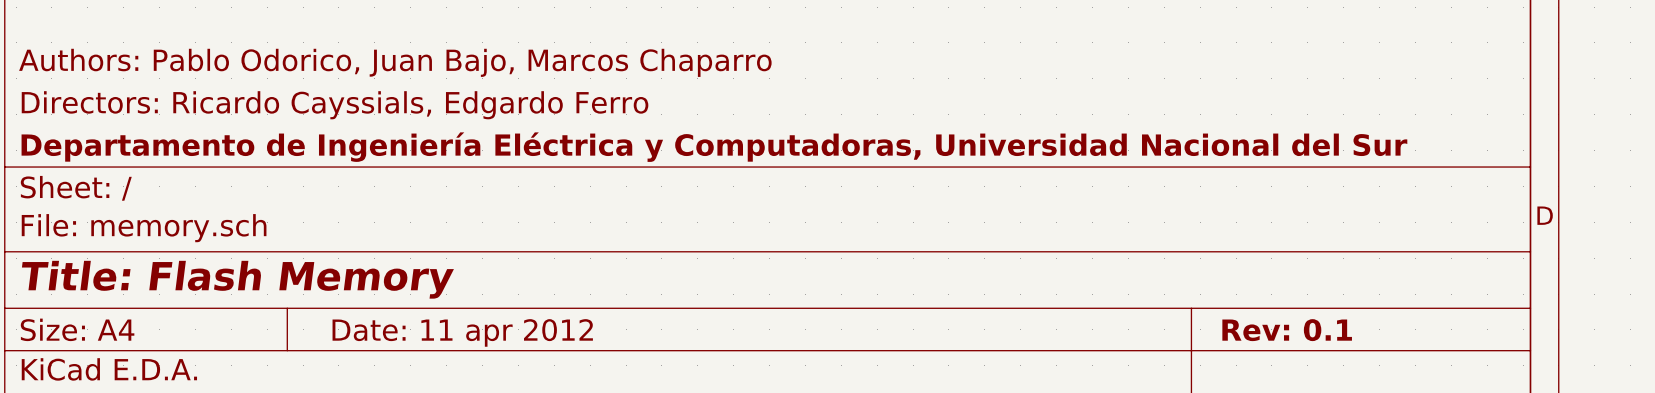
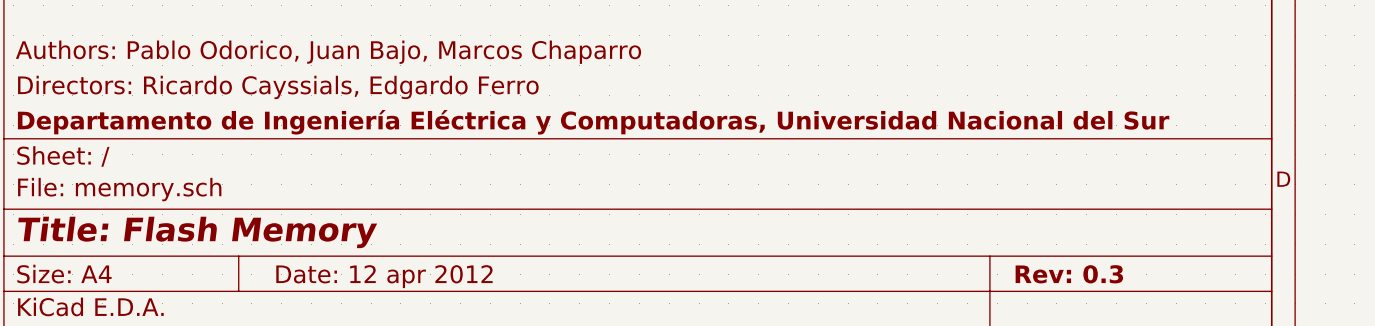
title block: Rev: 0.1 (1287, 330) -> Rev: 0.3 (1069, 274)
title block: Date: 11 apr 2012 (462, 332) -> Date: 12 apr 2012 (384, 276)

